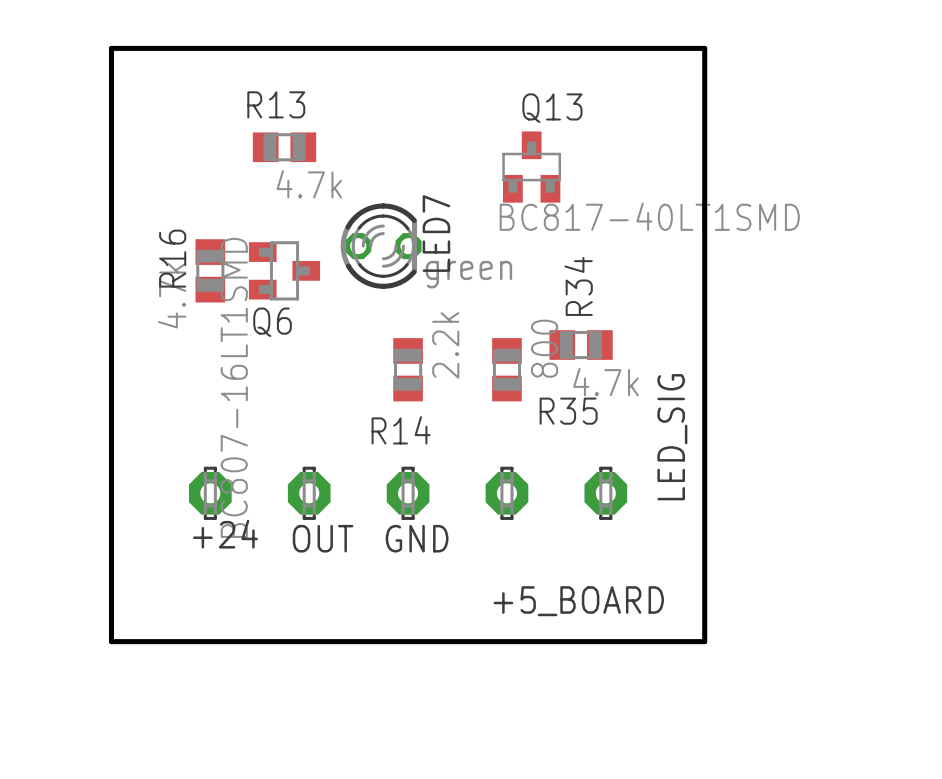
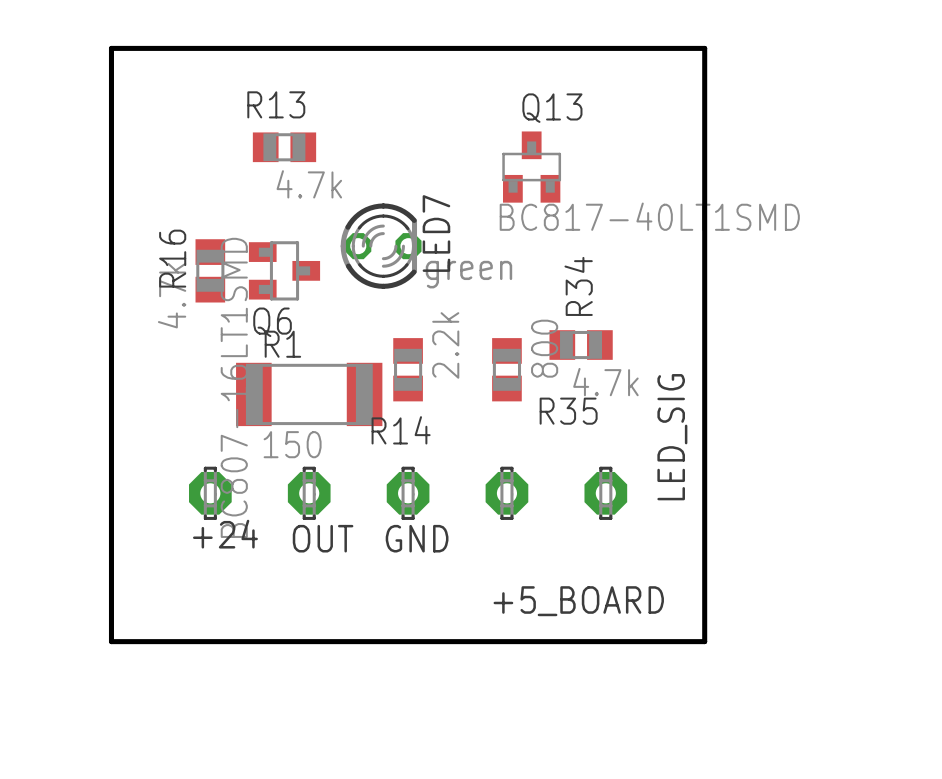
R1: none -> 150 (309, 394)

